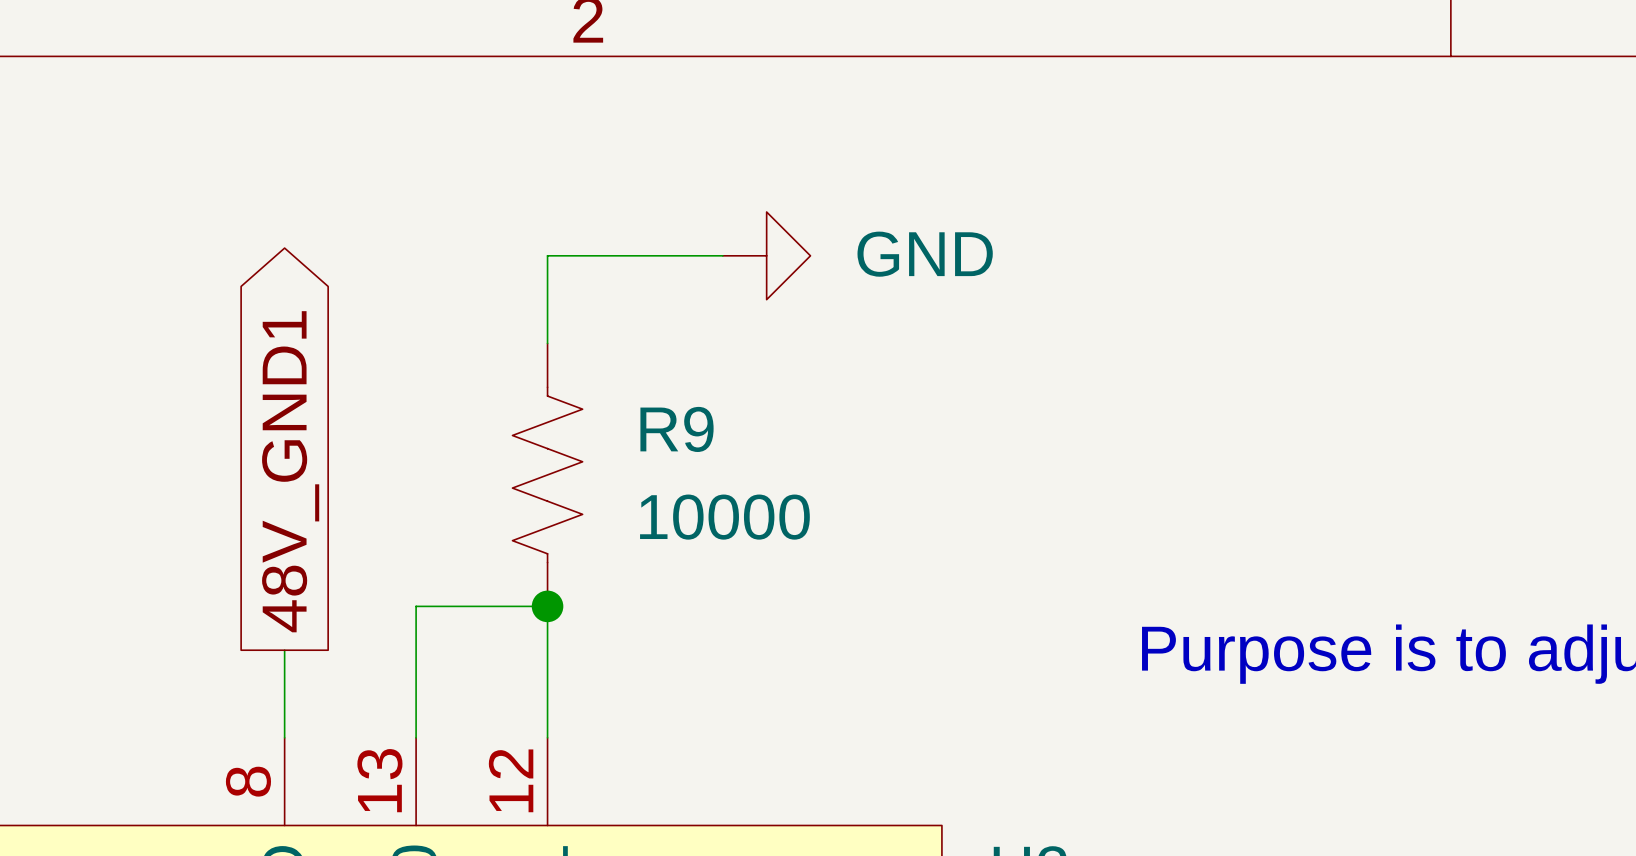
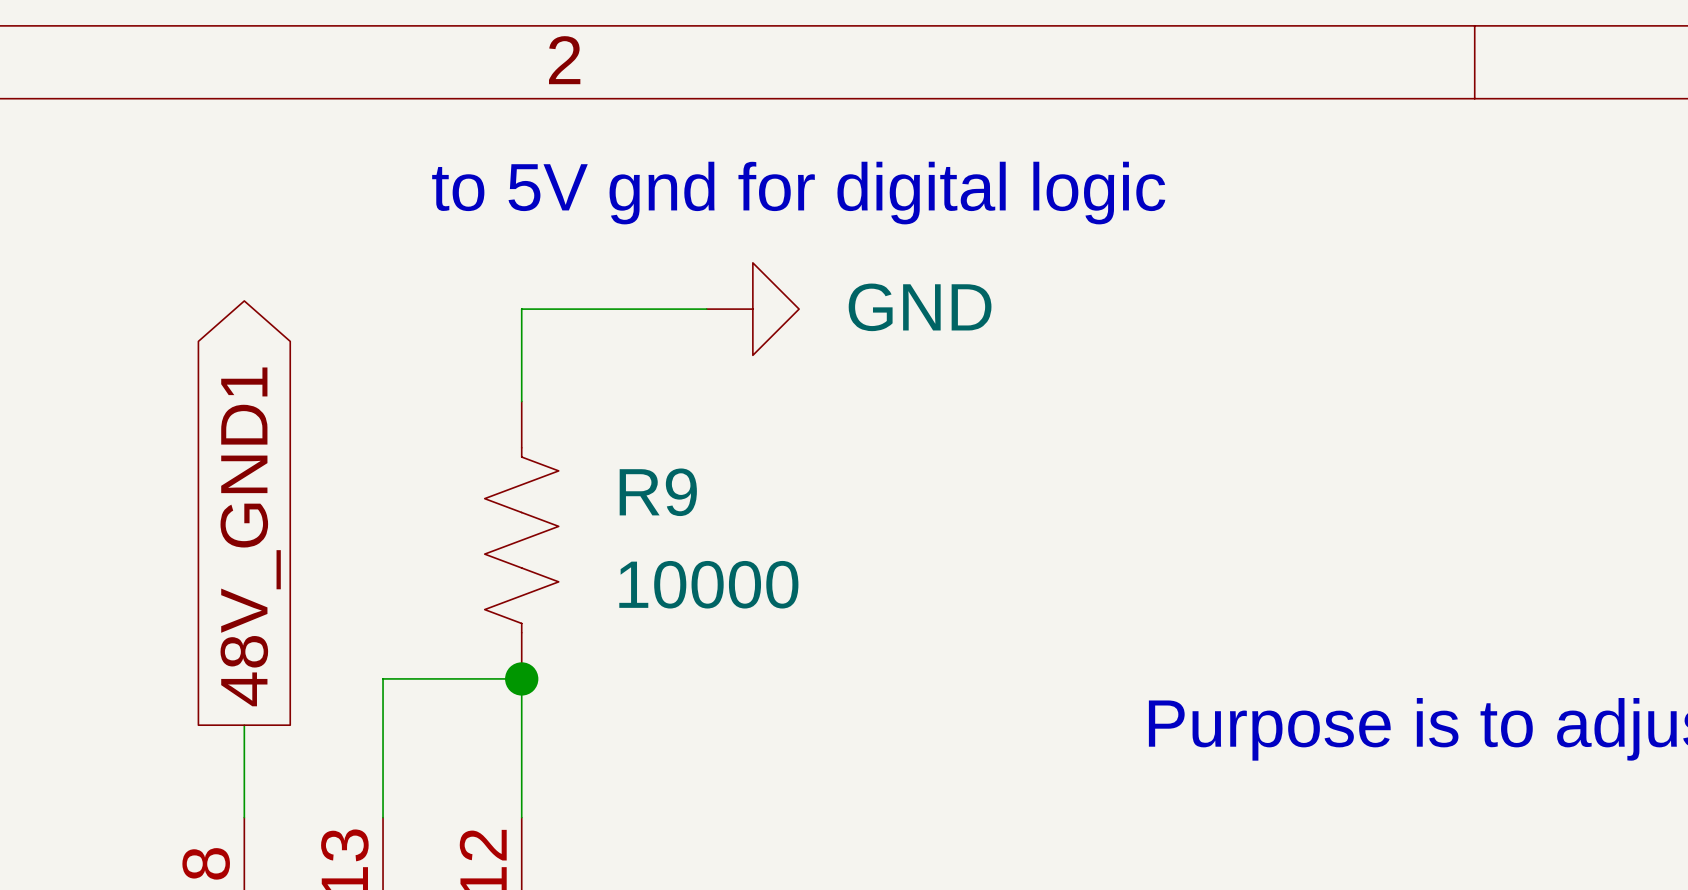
text: none -> to 5V gnd for digital logic (798, 193)

